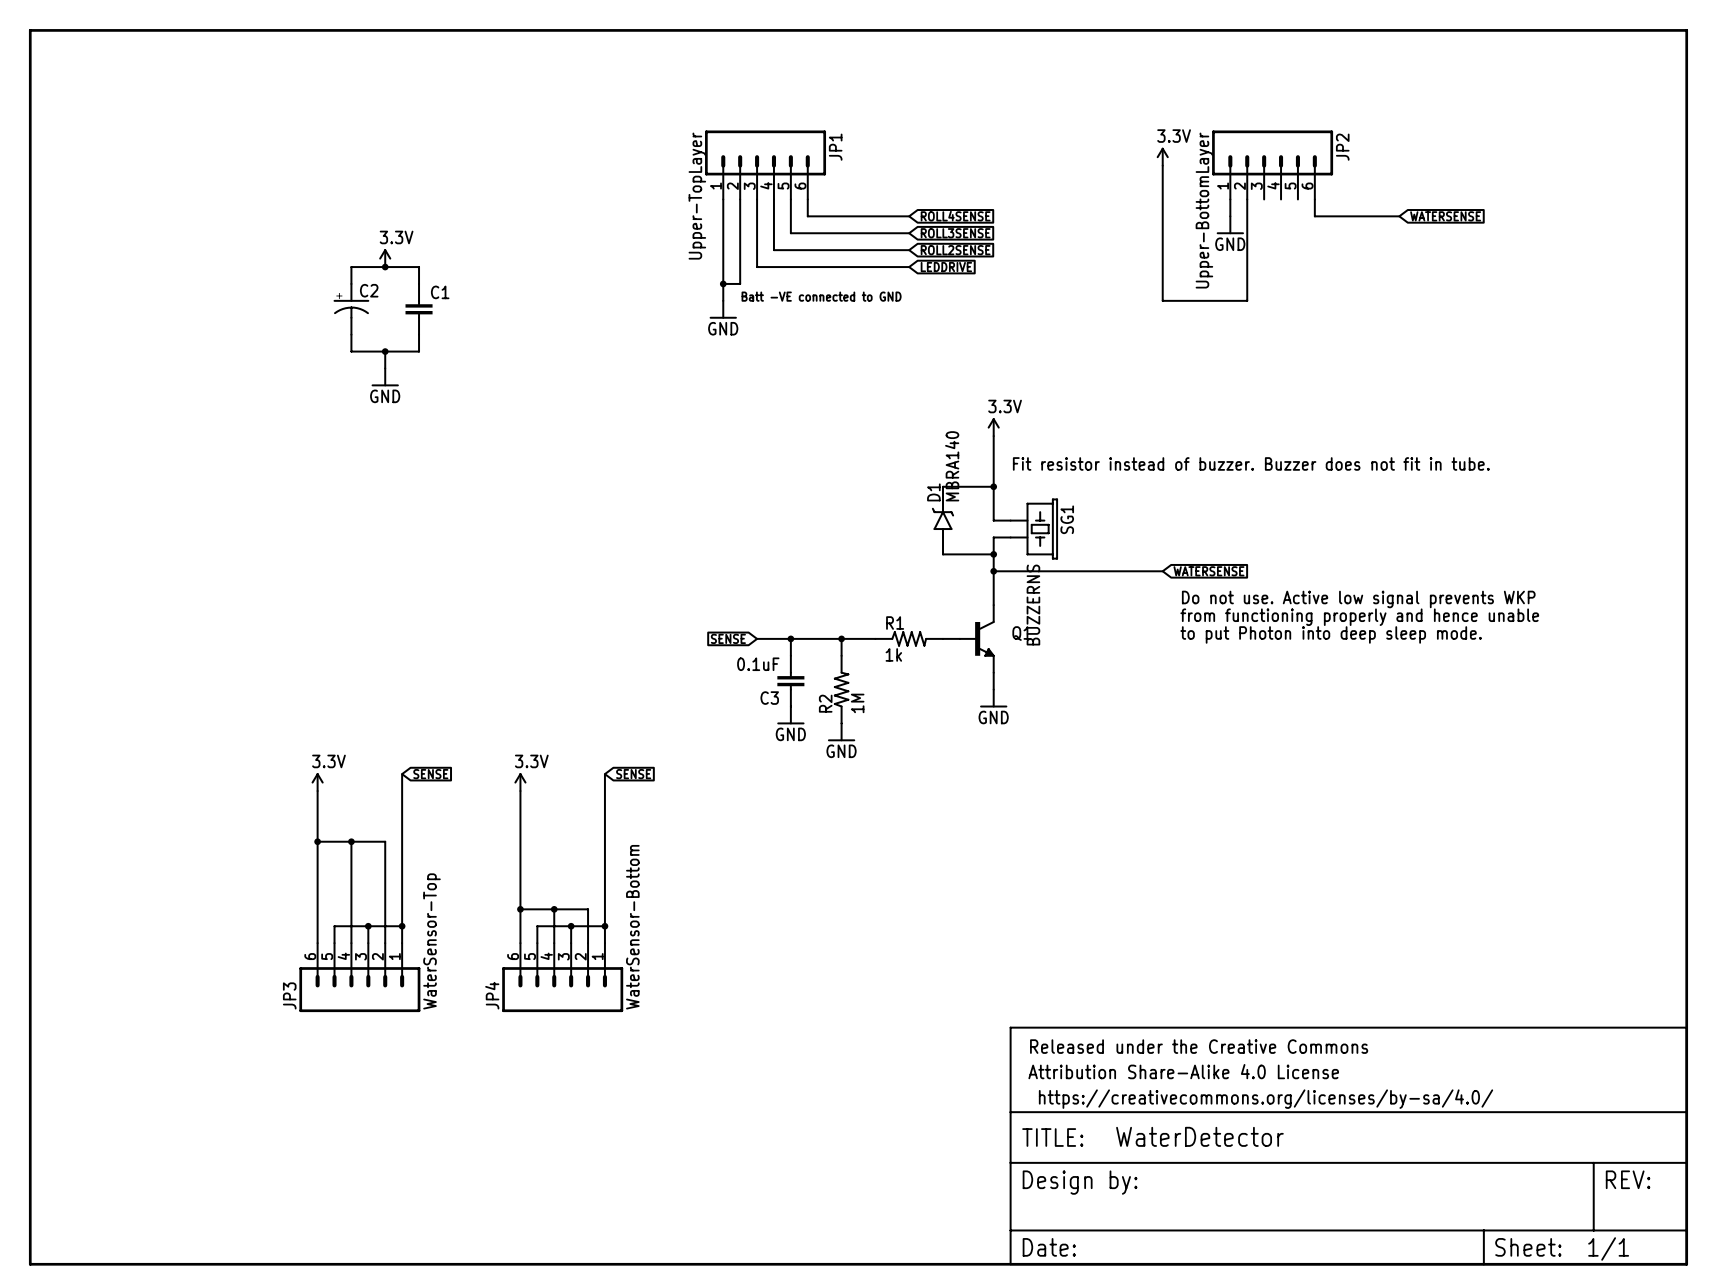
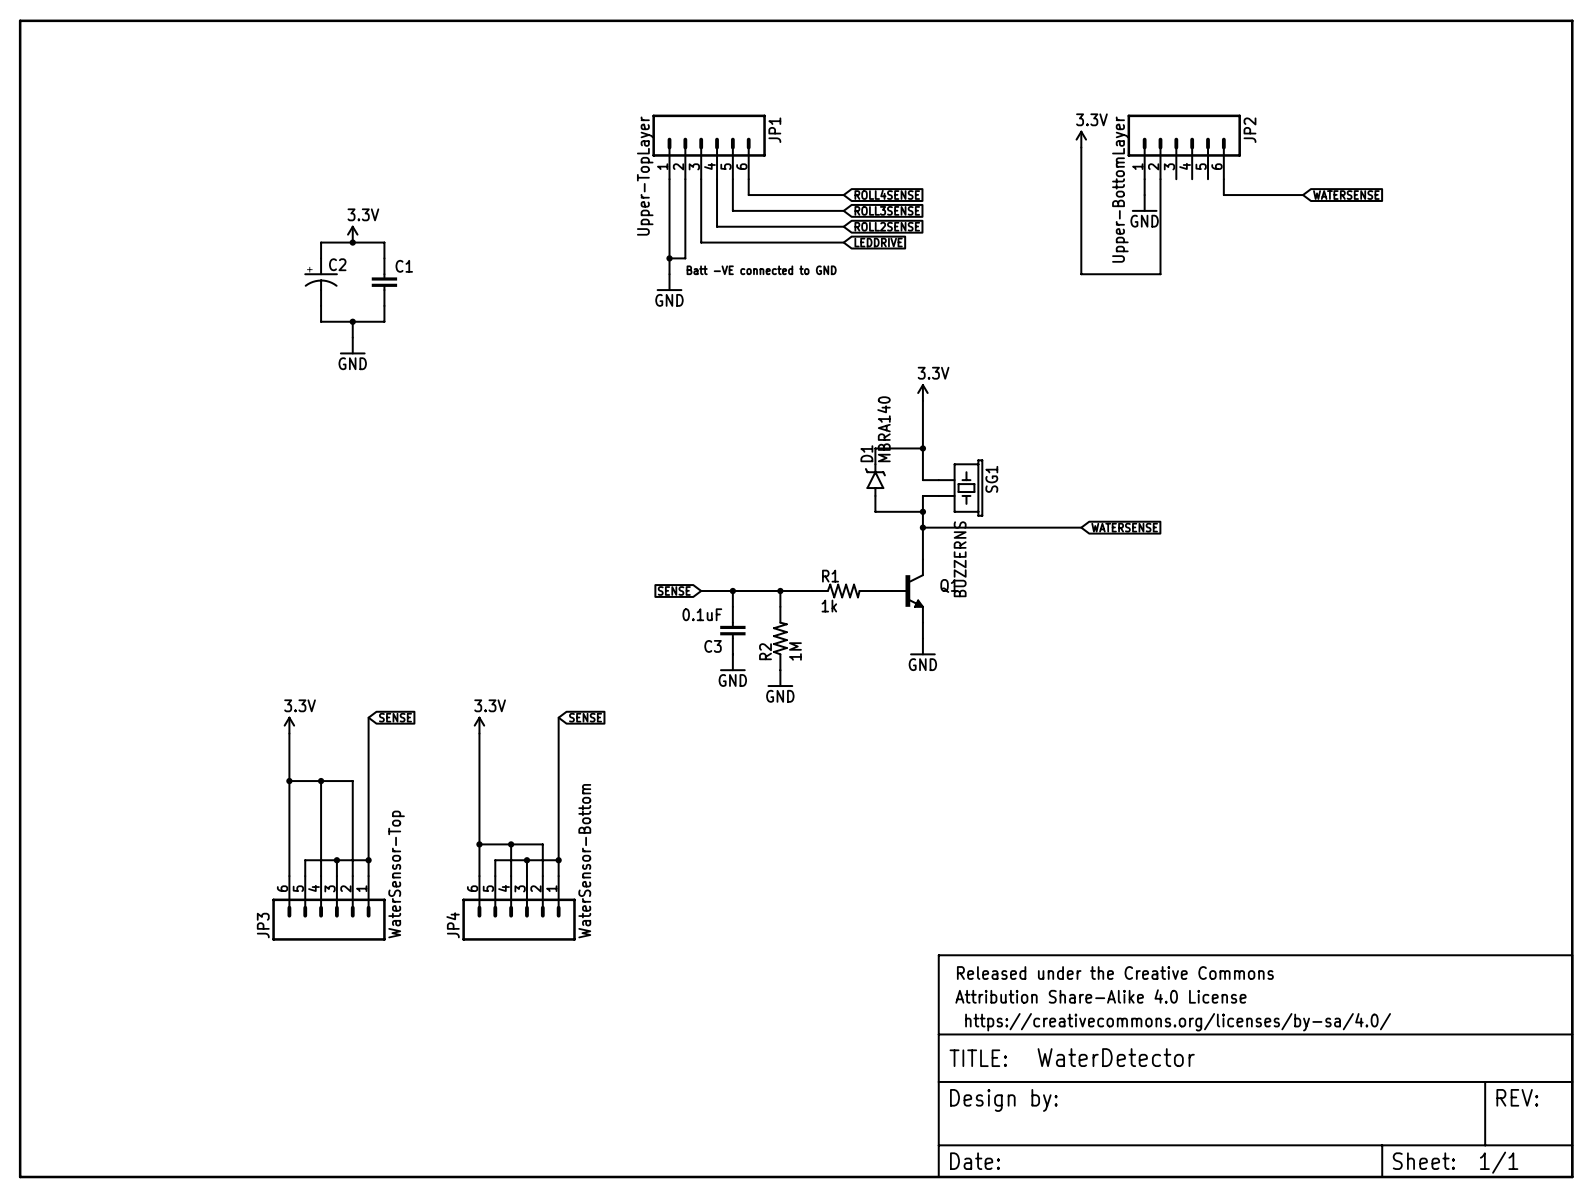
text: Fit resistor instead of buzzer. Buzzer does not fit in tube. (1251, 463) -> none
text: Do not use. Active low signal prevents WKP (1358, 599) -> none
text: from functioning properly and hence unable (1359, 617) -> none
text: to put Photon into deep sleep mode. (1331, 634) -> none

